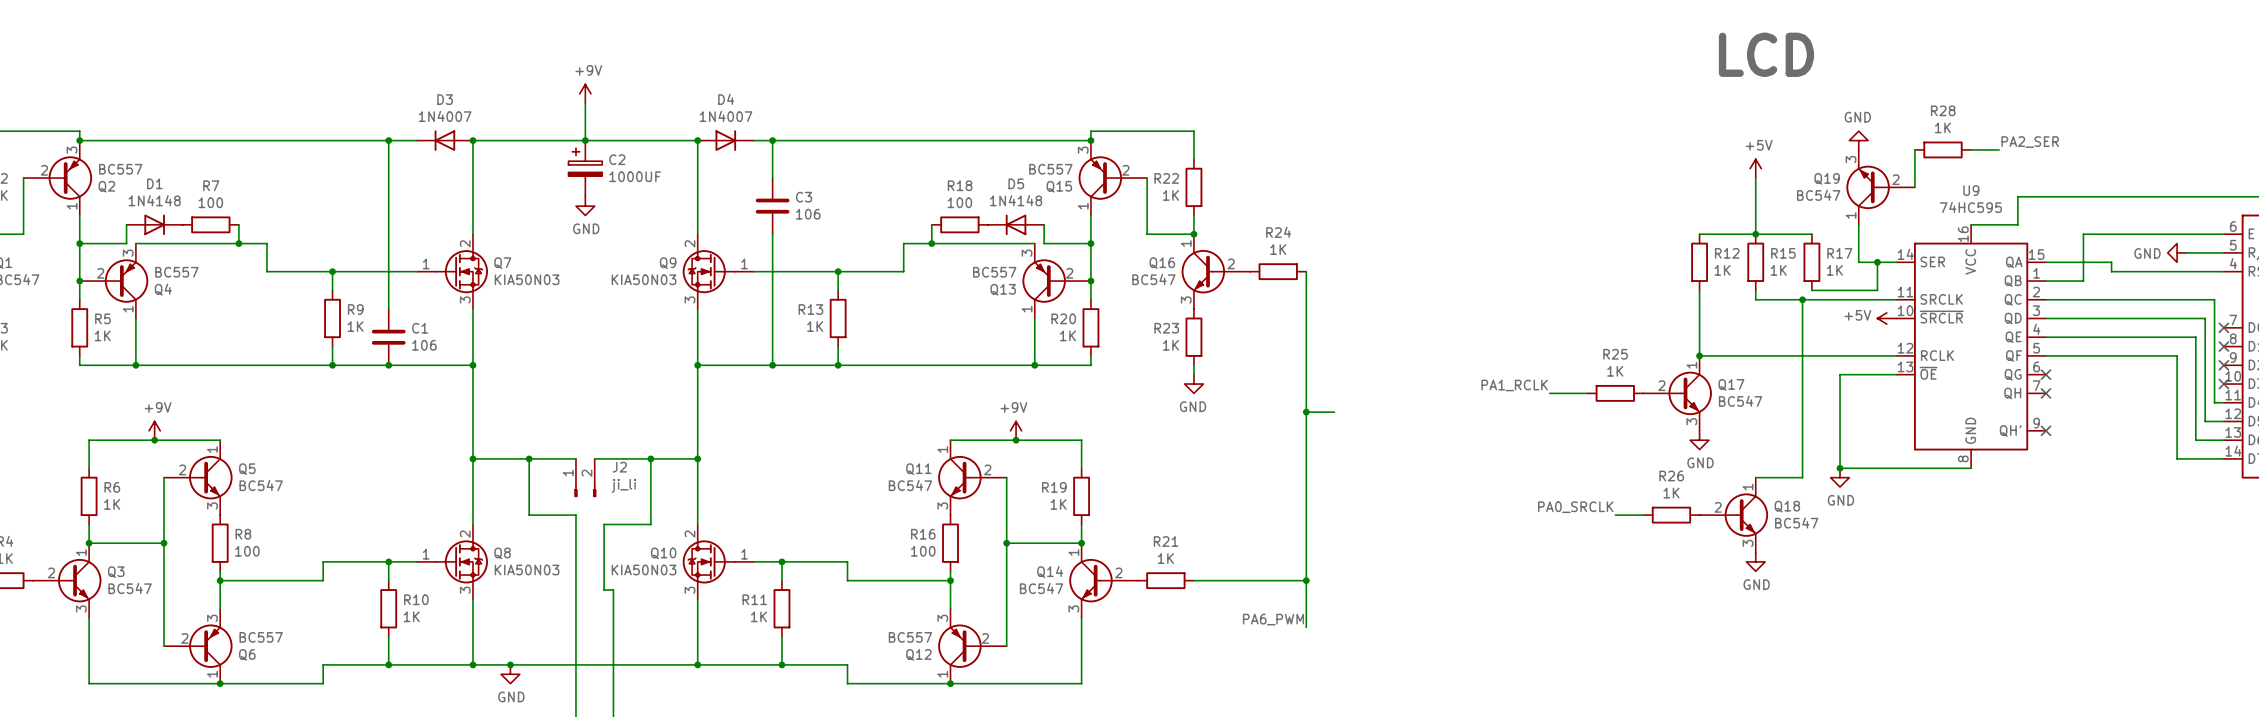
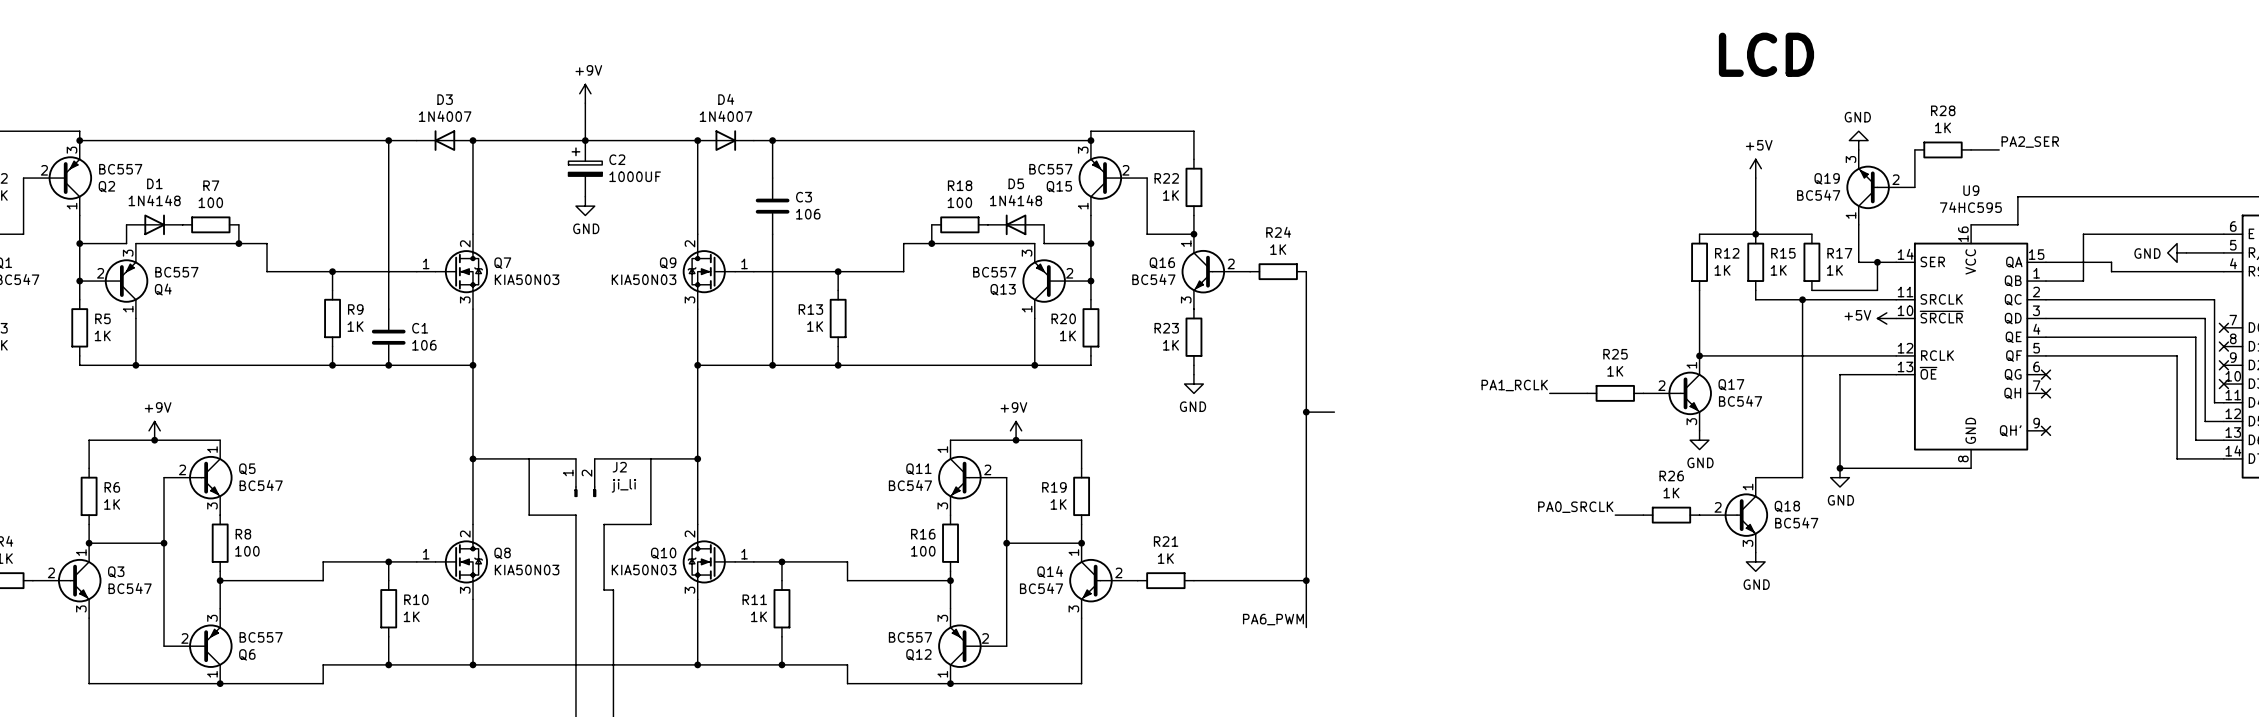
junction: (529, 458) -> none
junction: (650, 458) -> none
junction: (510, 664) -> none
power symbol: GND (510, 674) -> none

